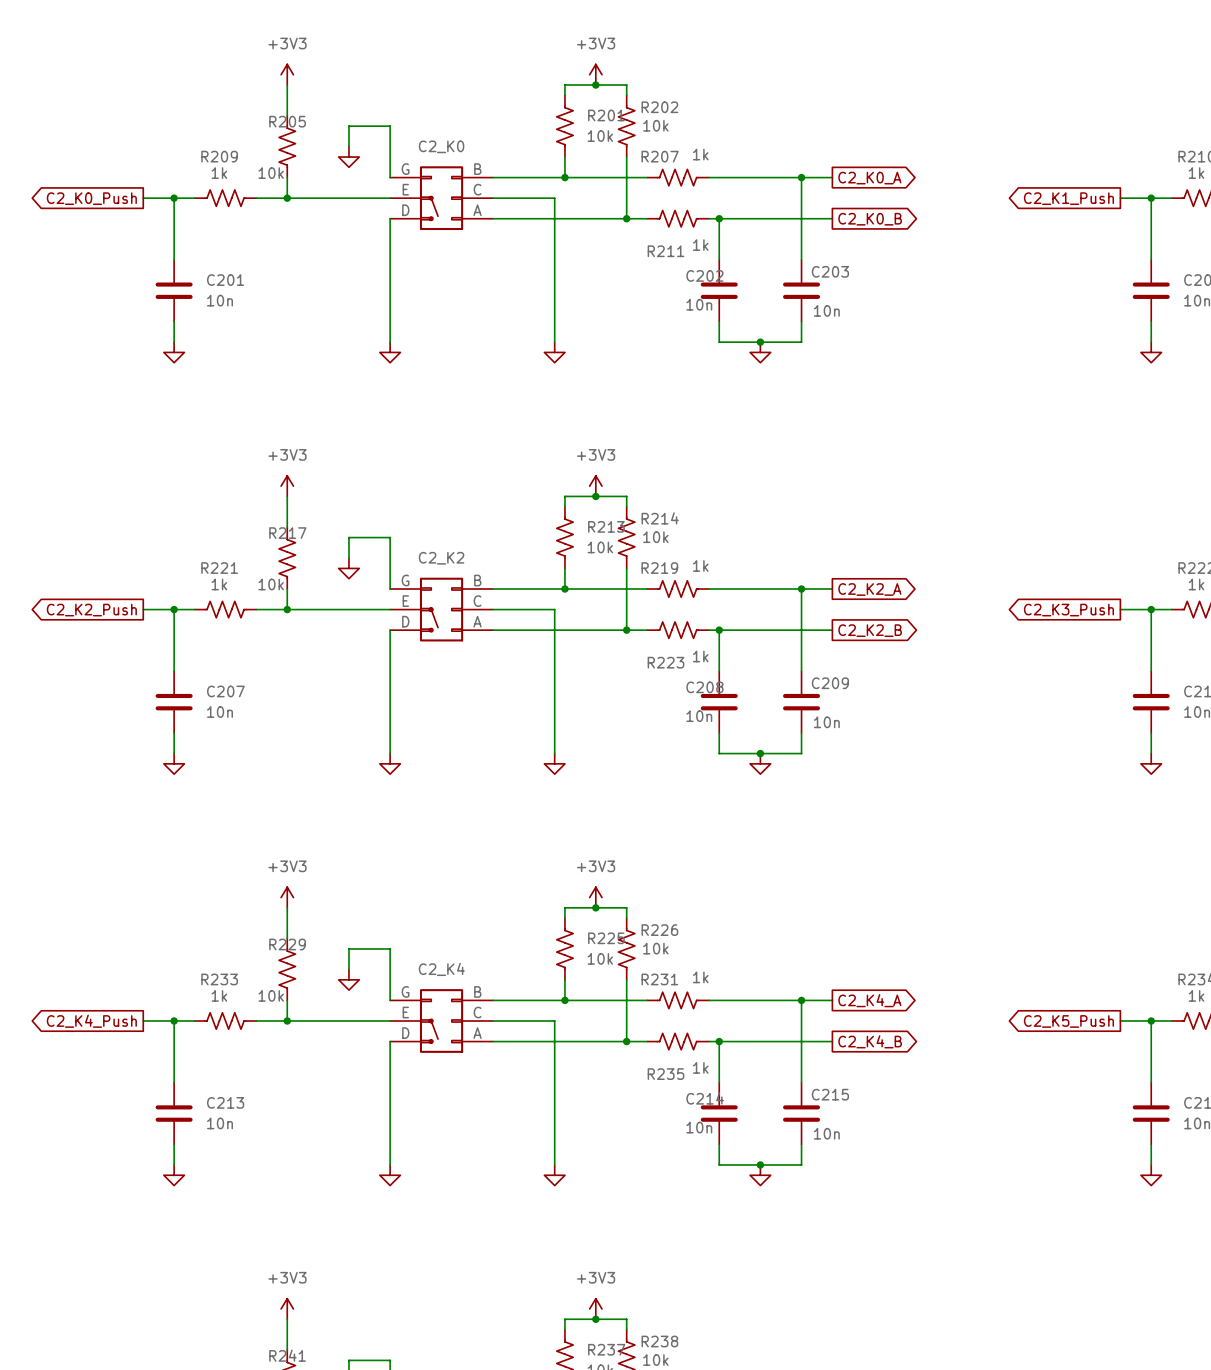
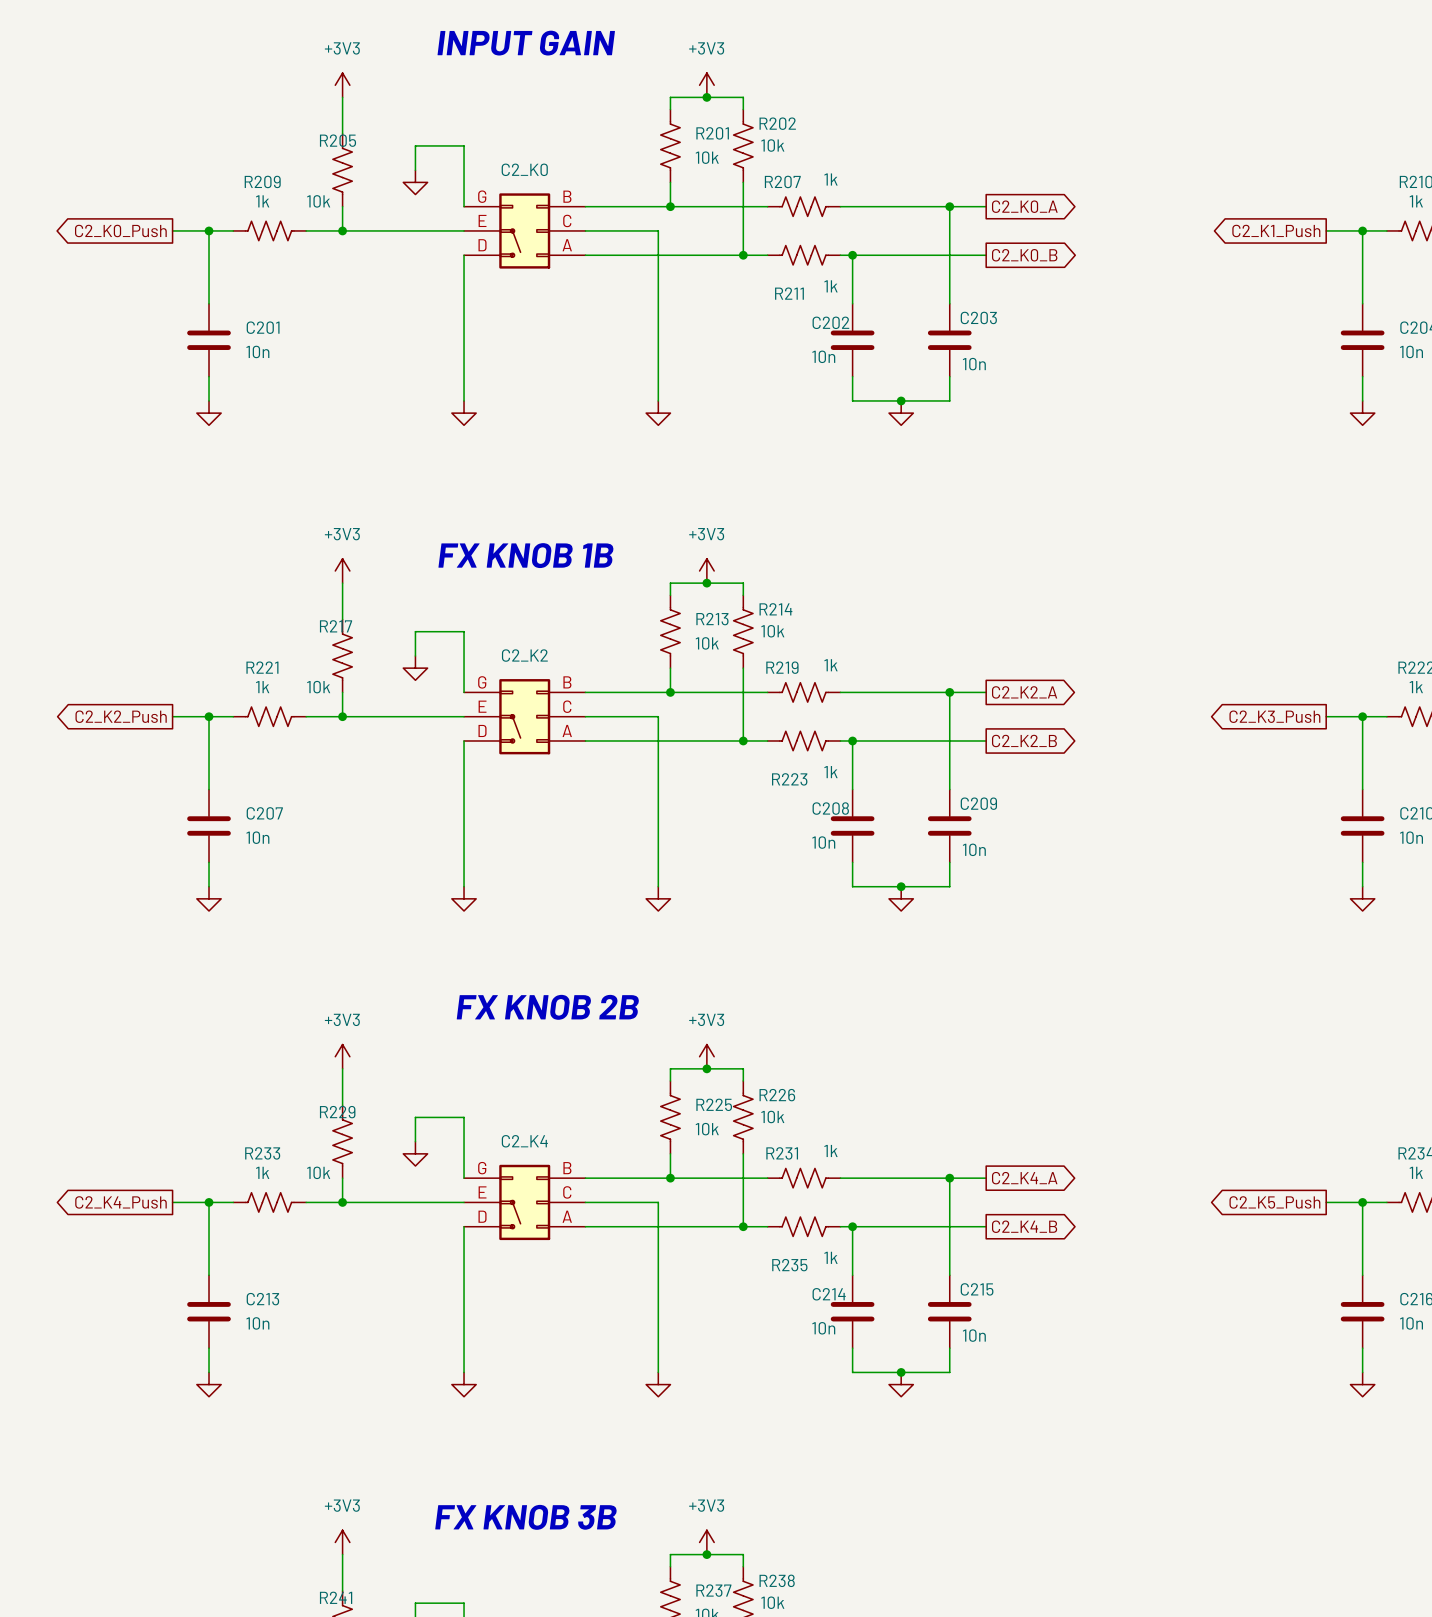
text: none -> INPUT GAIN (526, 43)
text: none -> FX KNOB 1B (526, 555)
text: none -> FX KNOB 2B (548, 1007)
text: none -> FX KNOB 3B (526, 1517)

